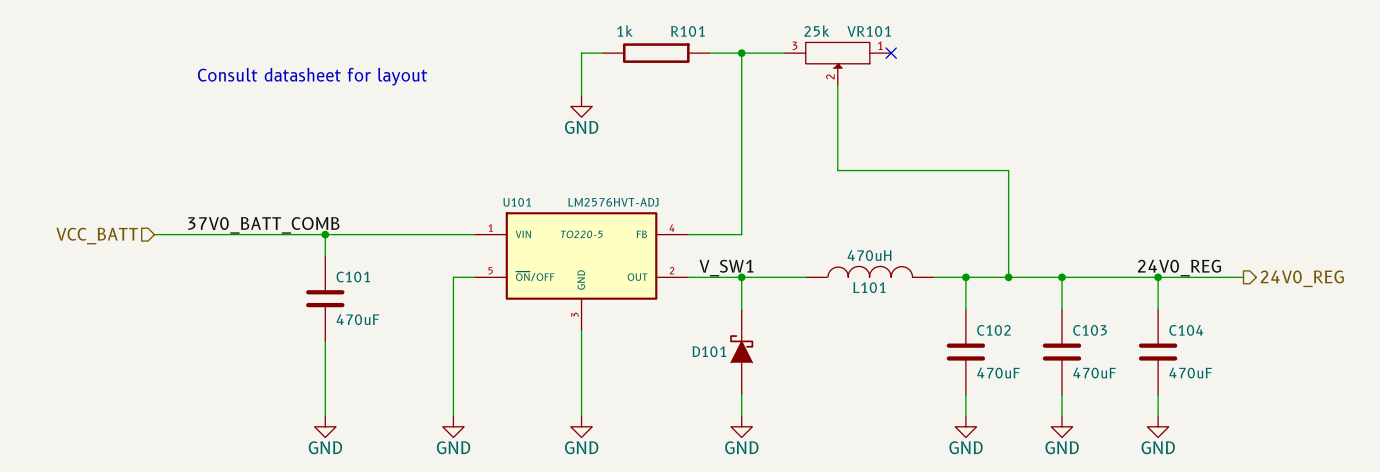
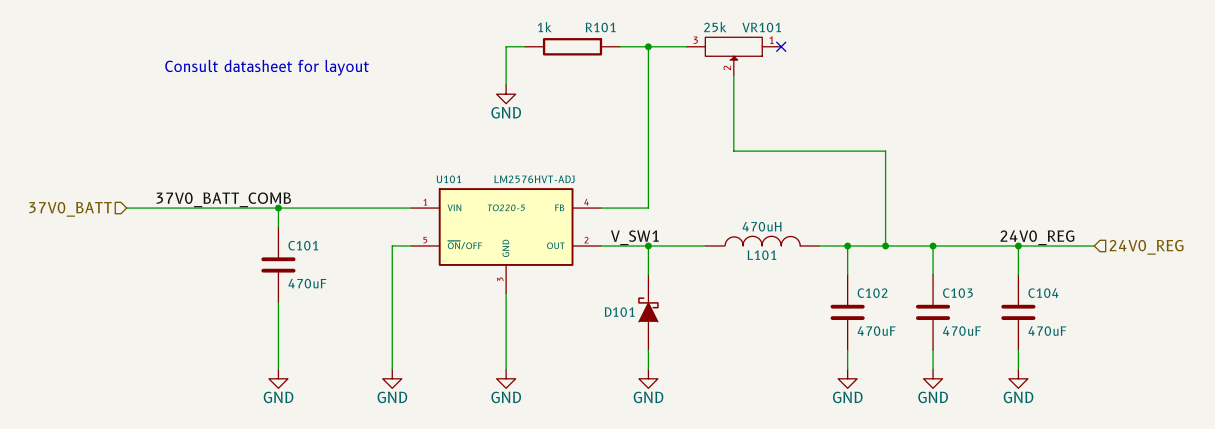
hierarchical label: VCC_BATT (97, 236) -> 37V0_BATT (70, 209)
hierarchical label shape: output (1302, 278) -> input (1146, 247)

